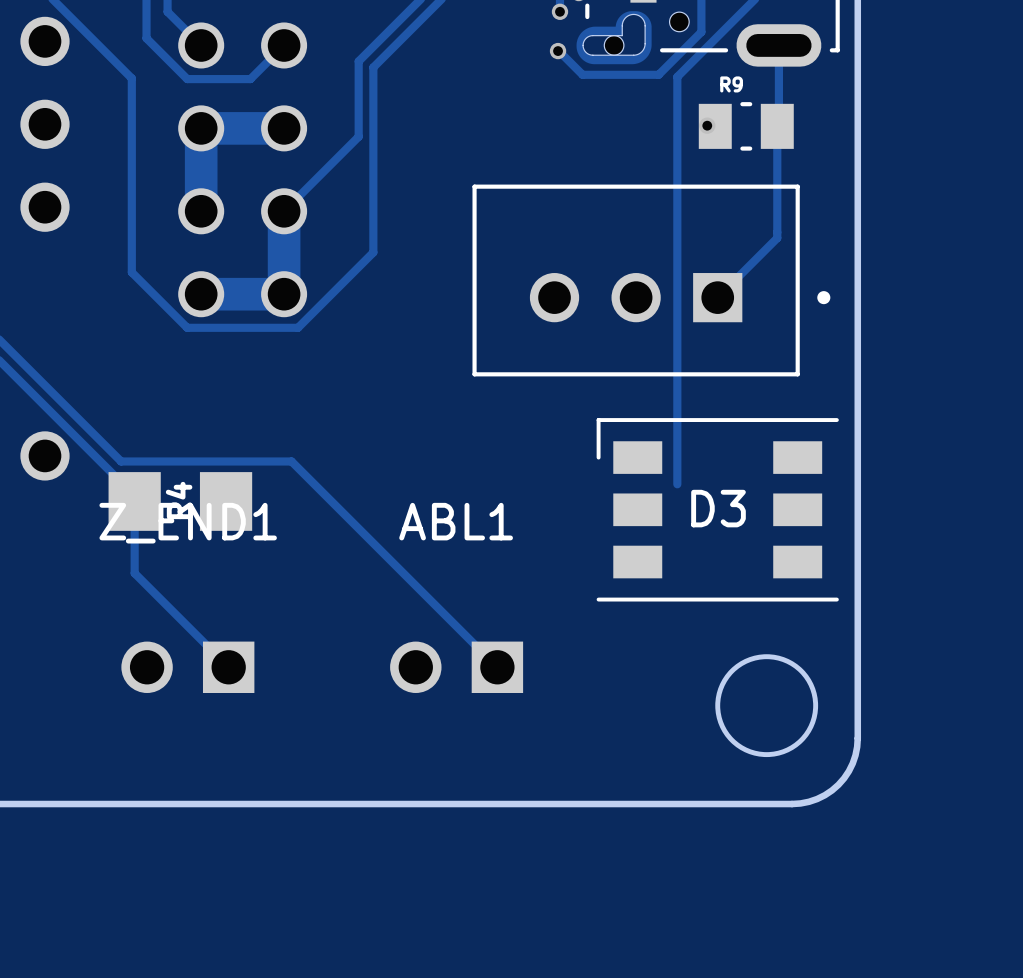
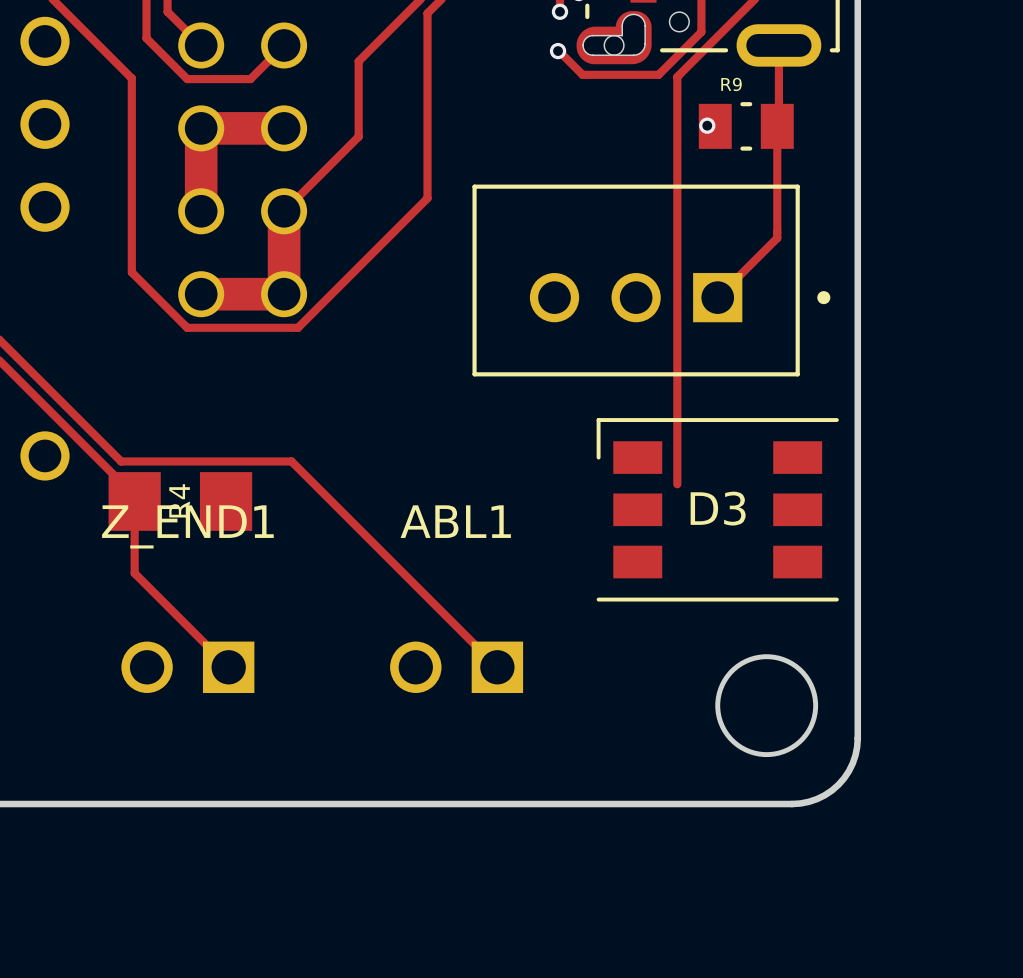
track: (427, 13) (373, 67) (373, 252) -> (427, 13) (427, 198) (373, 252)

